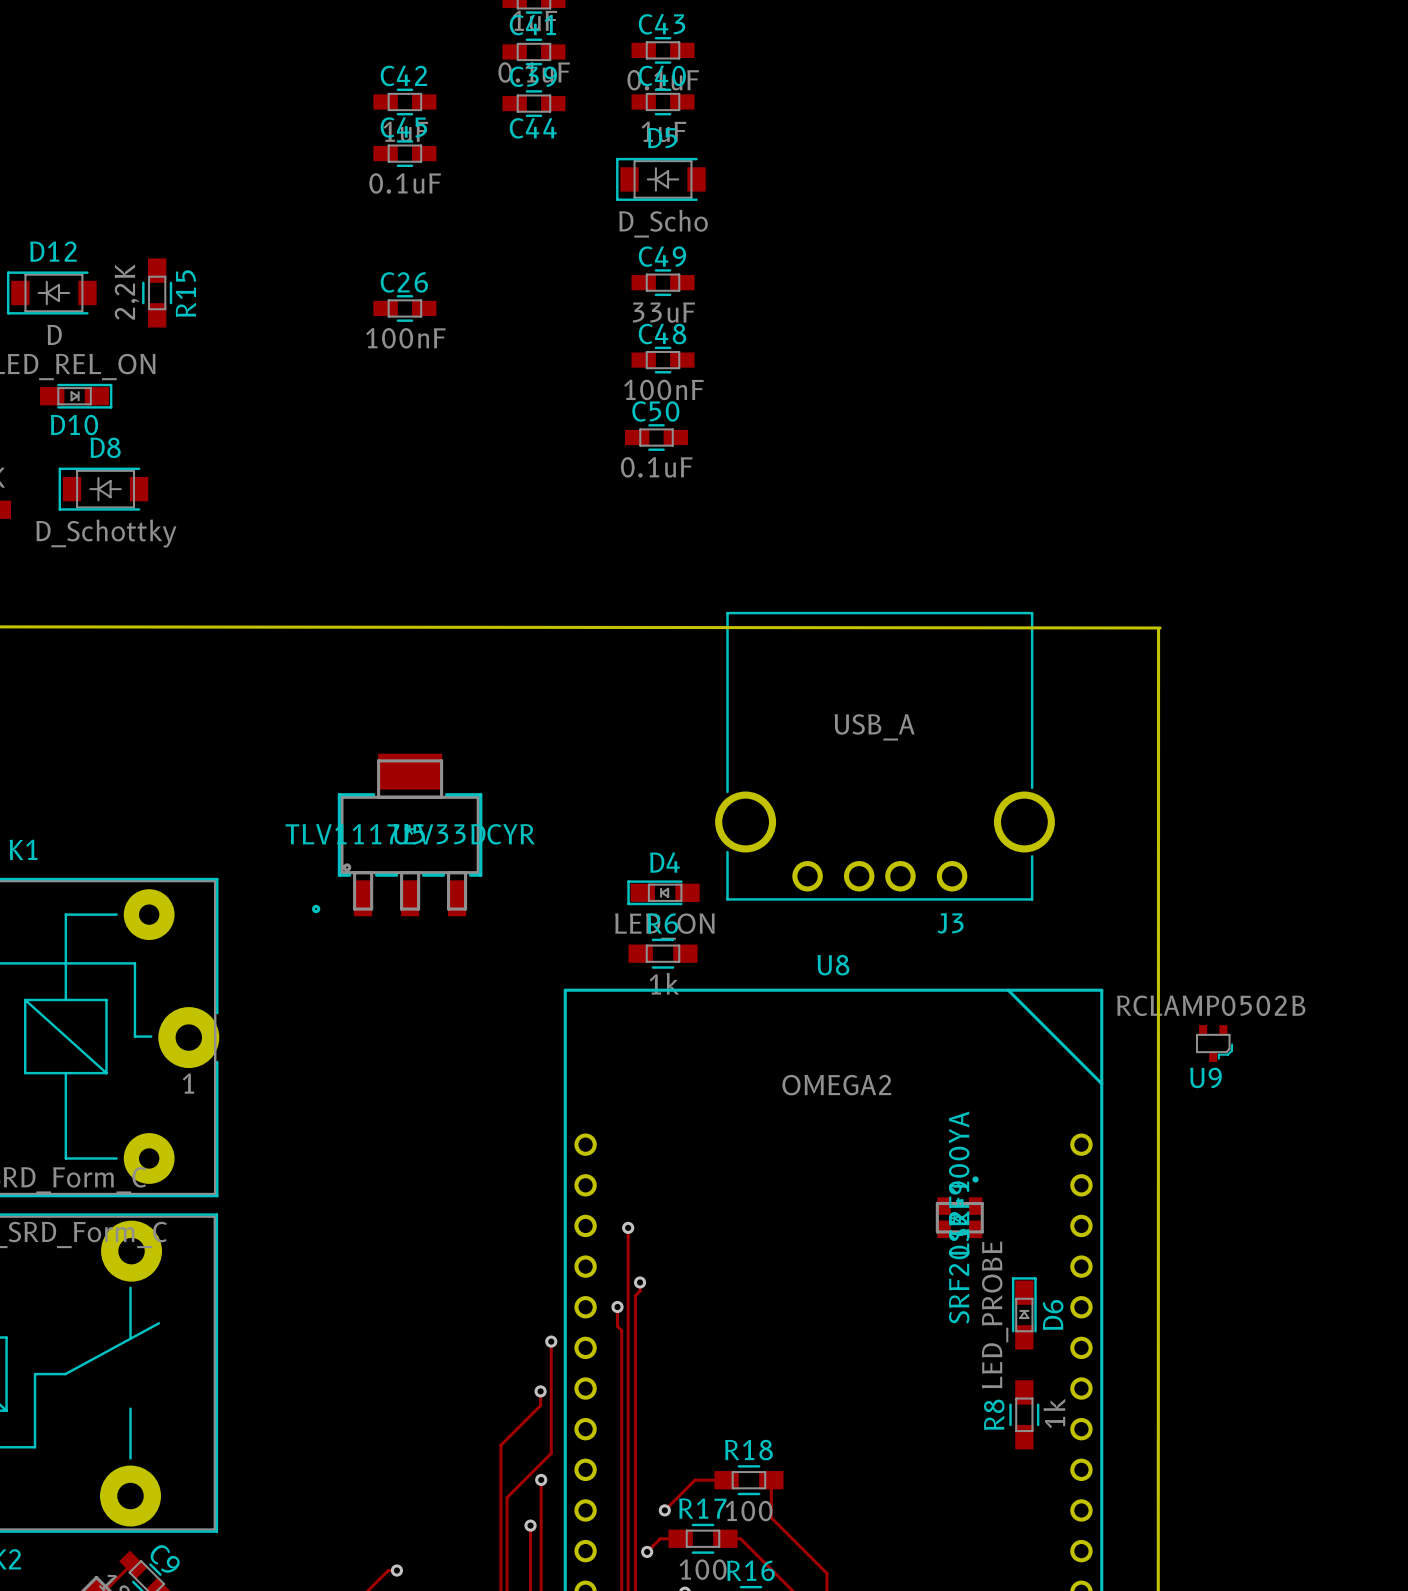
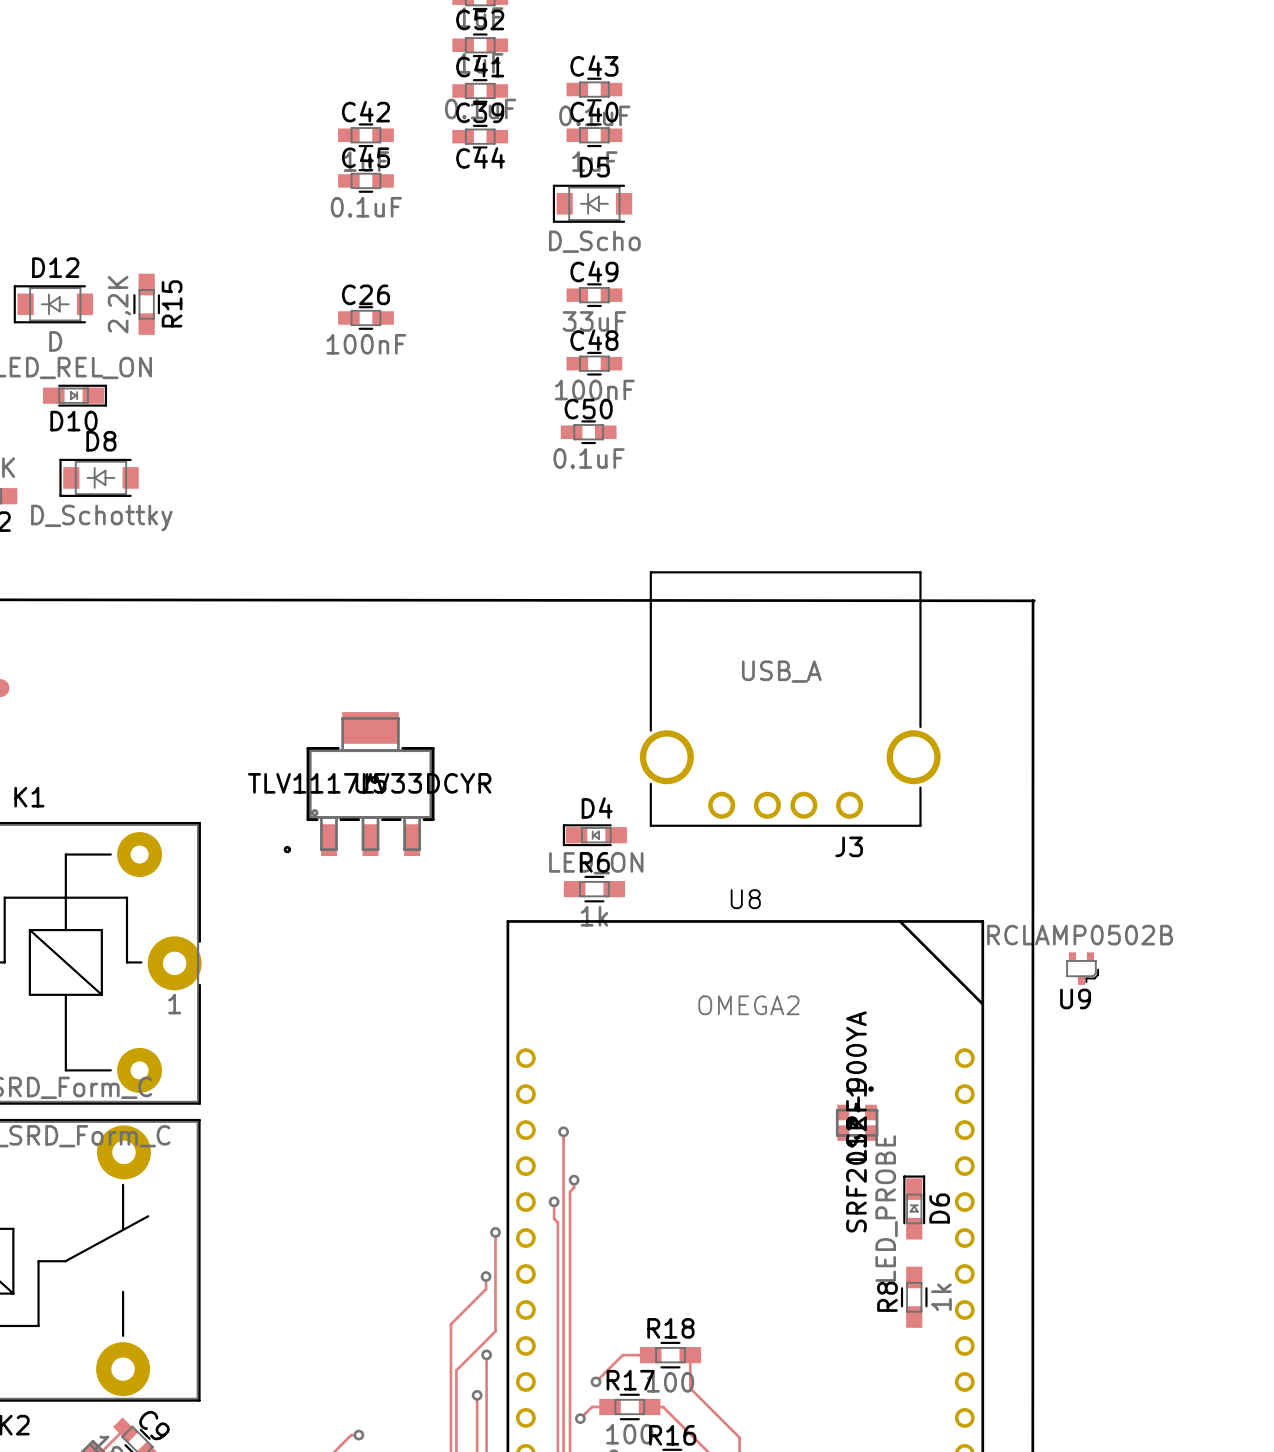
J3 position: (885, 756) -> (790, 699)

